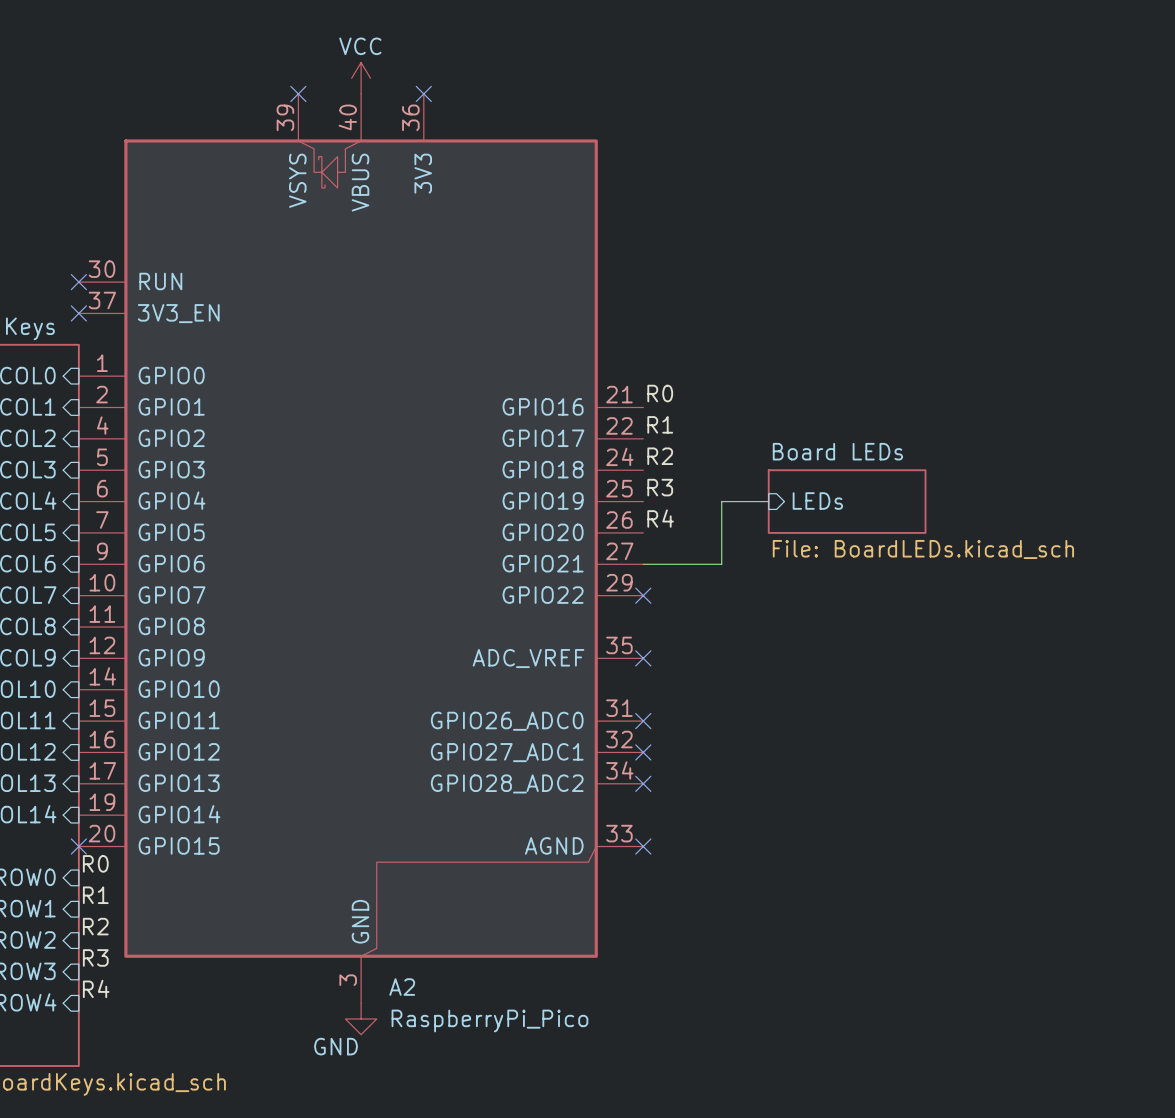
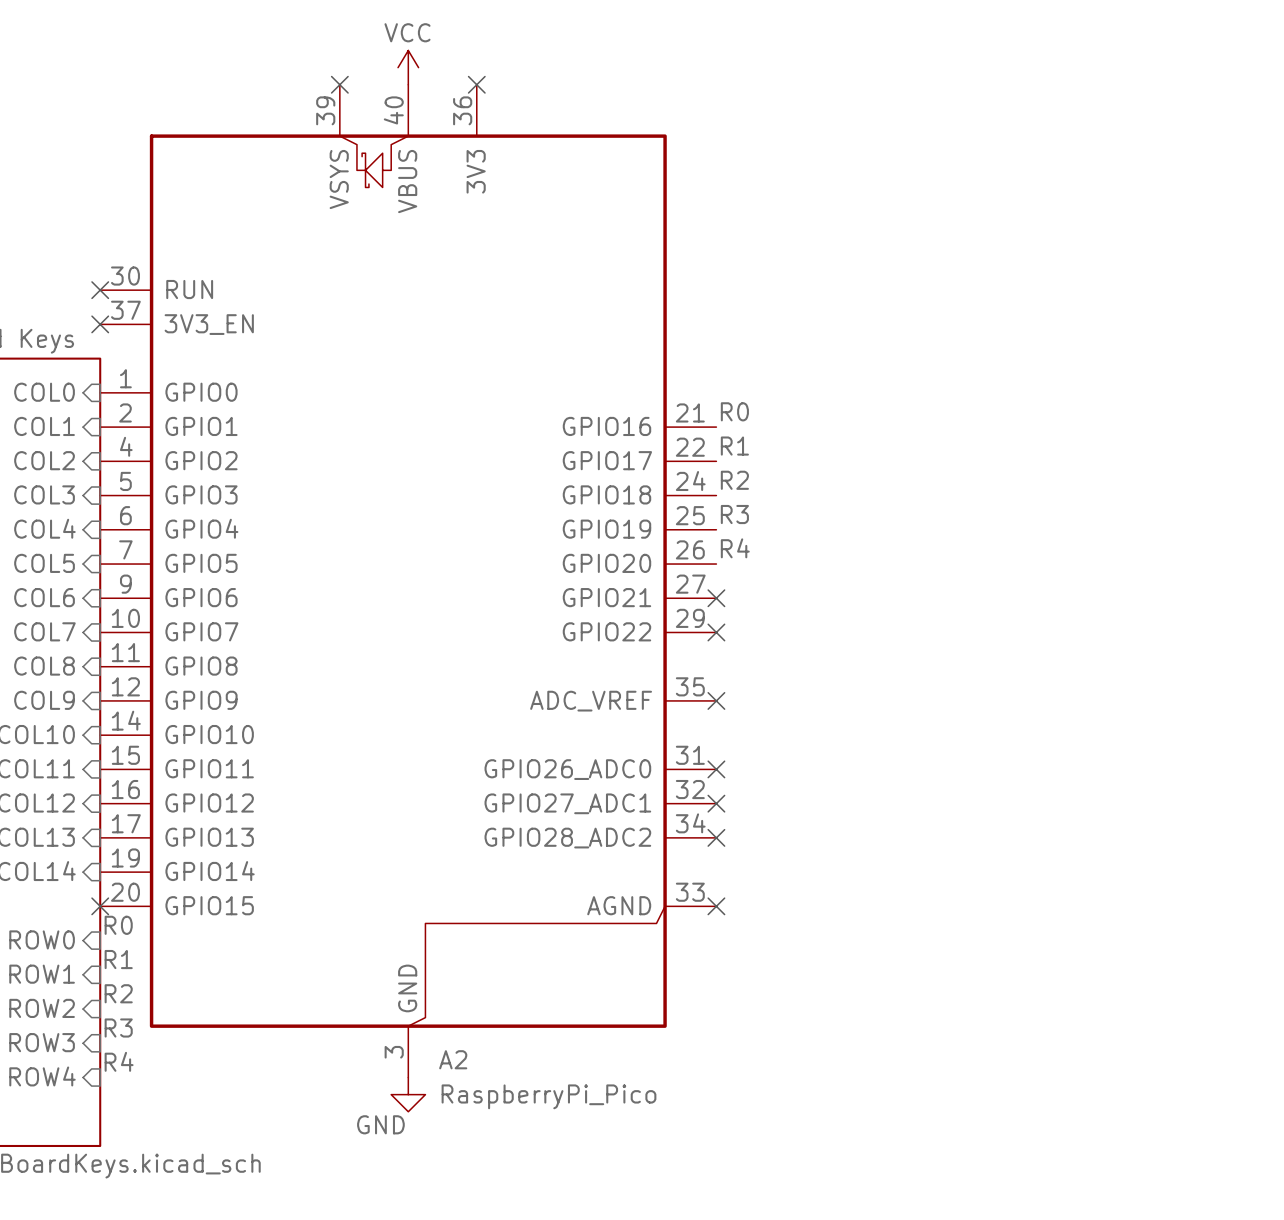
sheet pin: LEDs (817, 500) -> none
wire: (768, 501) (721, 501) (721, 564) (643, 564) -> none
sheet Board LEDs: File: BoardLEDs.kicad_sch (847, 501) -> none
no-connect mark: none -> (716, 598)

